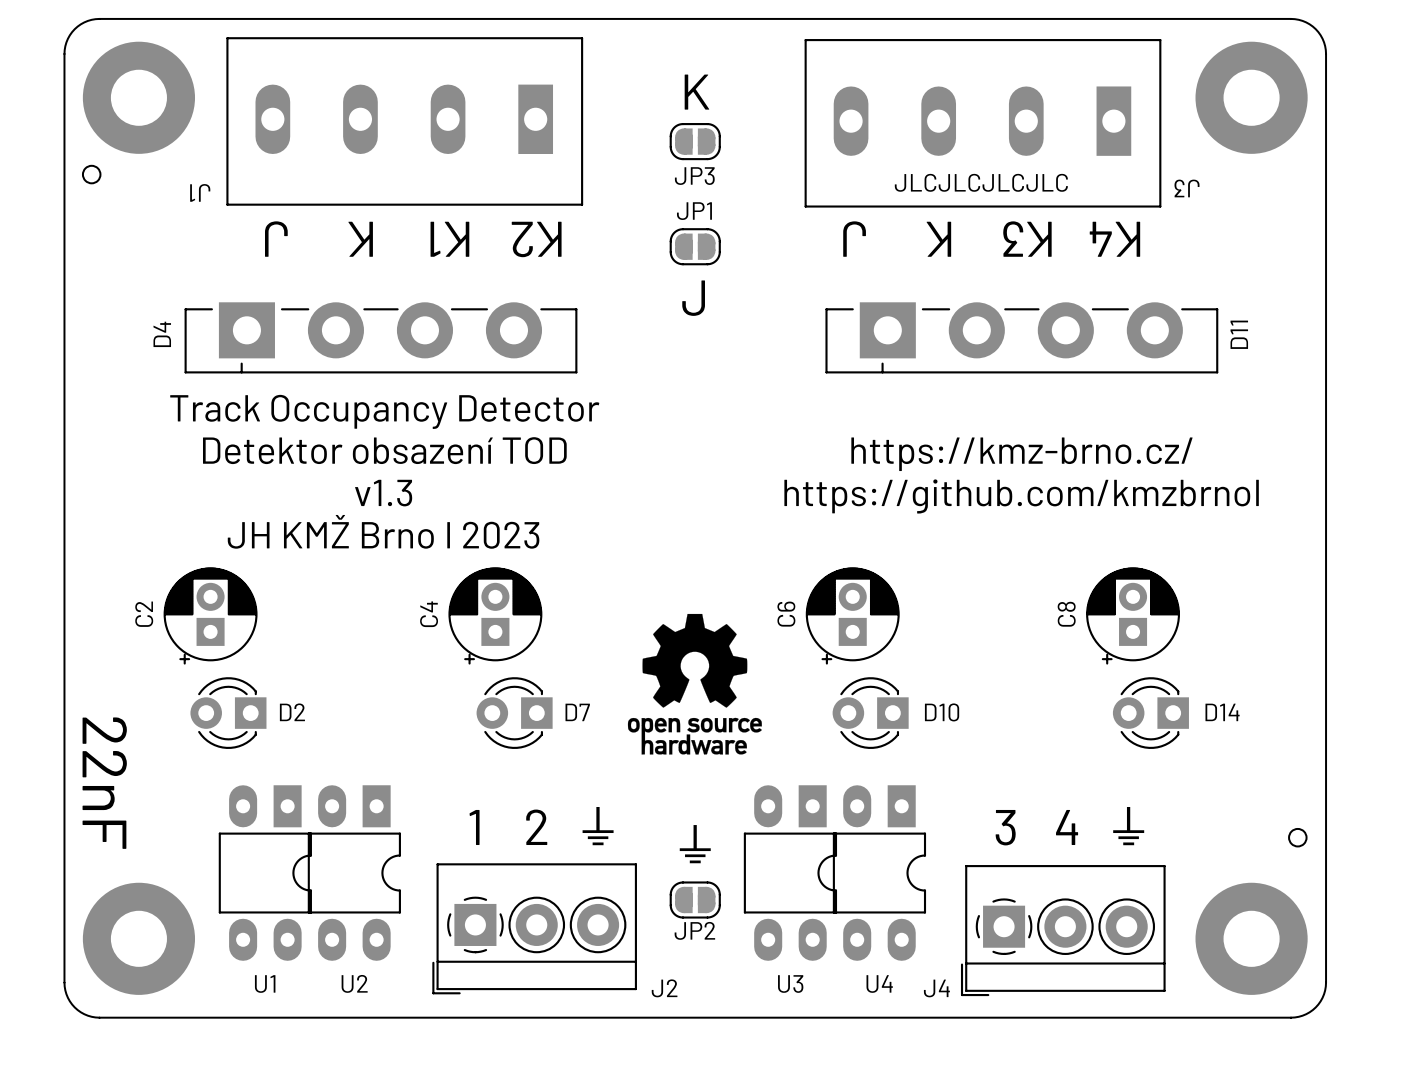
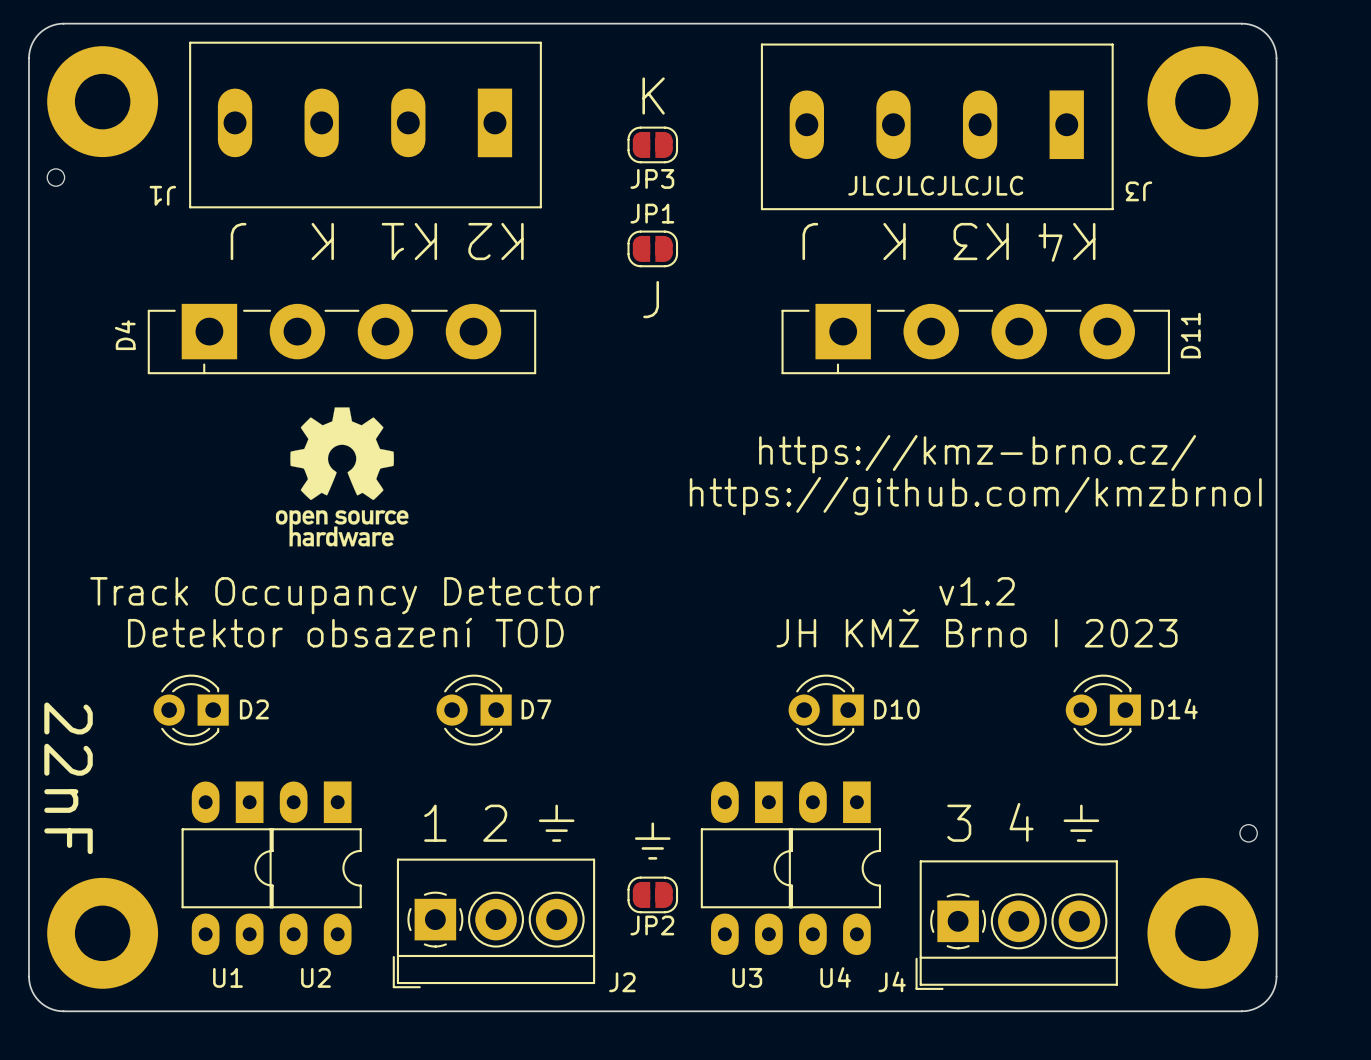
text position: Track Occupancy Detector (384, 411) -> Track Occupancy Detector (345, 595)
text position: Detektor obsazení TOD (384, 450) -> Detektor obsazení TOD (345, 632)
text: v1.3 (383, 493) -> none
text: JH KMŽ Brno I 2023 (383, 531) -> none
text: none -> v1.2 (977, 591)
C2: (210, 616) -> none
C4: (495, 616) -> none
C6: (852, 616) -> none
C8: (1133, 616) -> none
text: none -> JH KMŽ Brno I 2023 (977, 628)
drawing position: (694, 684) -> (342, 476)

